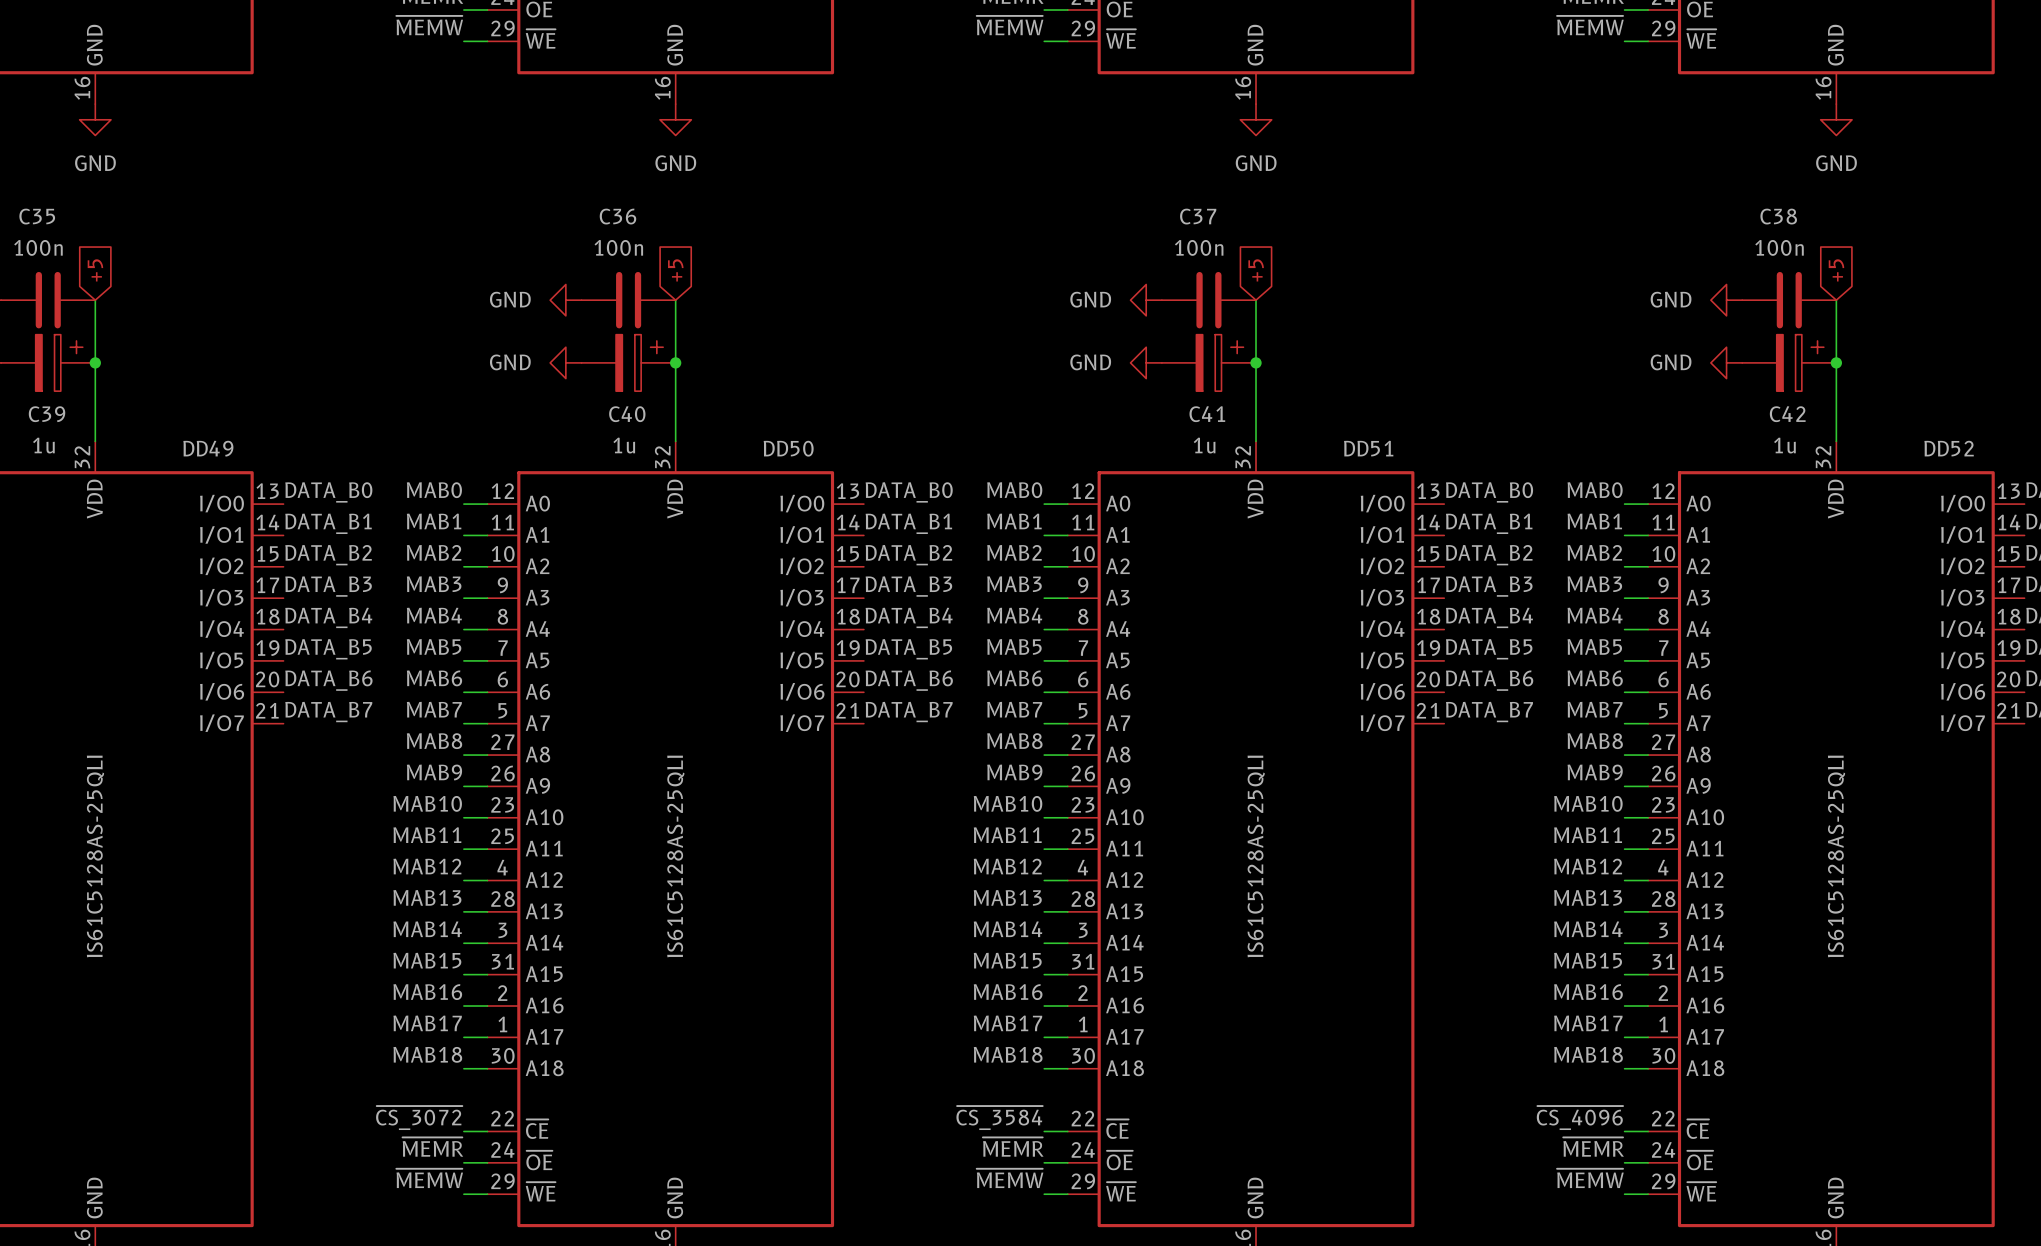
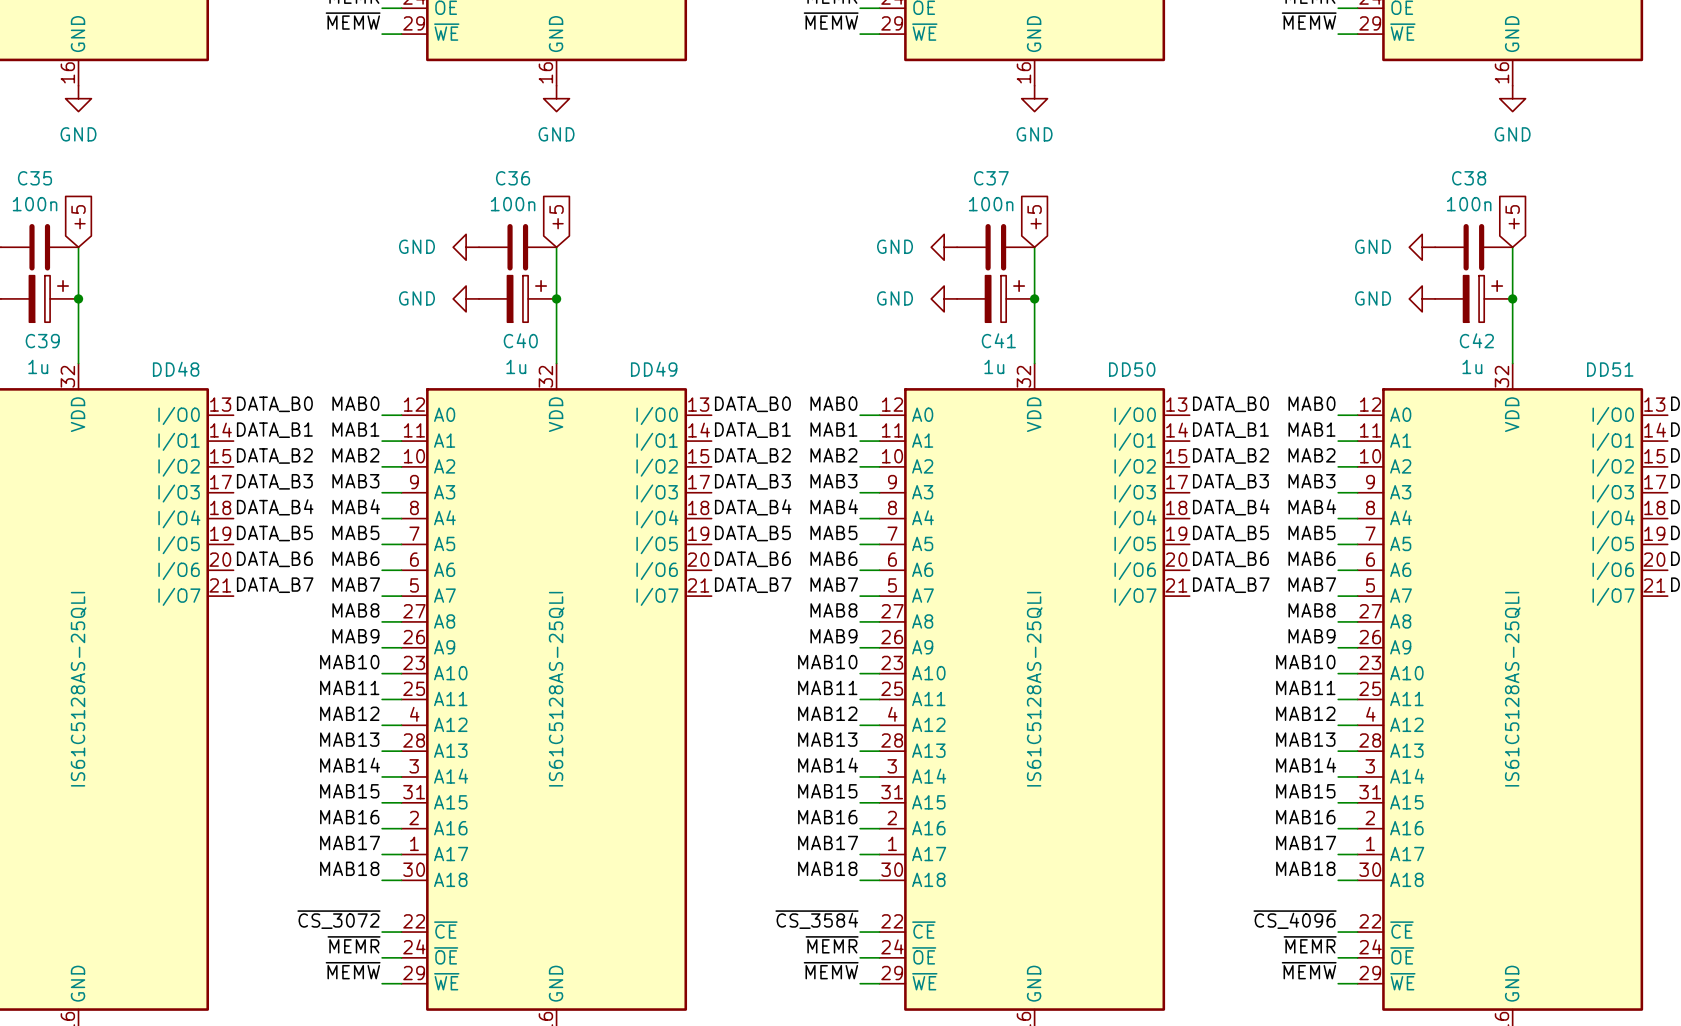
DD49 name: DD49 (208, 448) -> DD48 (176, 369)
DD50 name: DD50 (788, 448) -> DD49 (654, 369)
DD51 name: DD51 (1368, 448) -> DD50 (1132, 369)
DD52 name: DD52 (1949, 448) -> DD51 (1610, 369)

